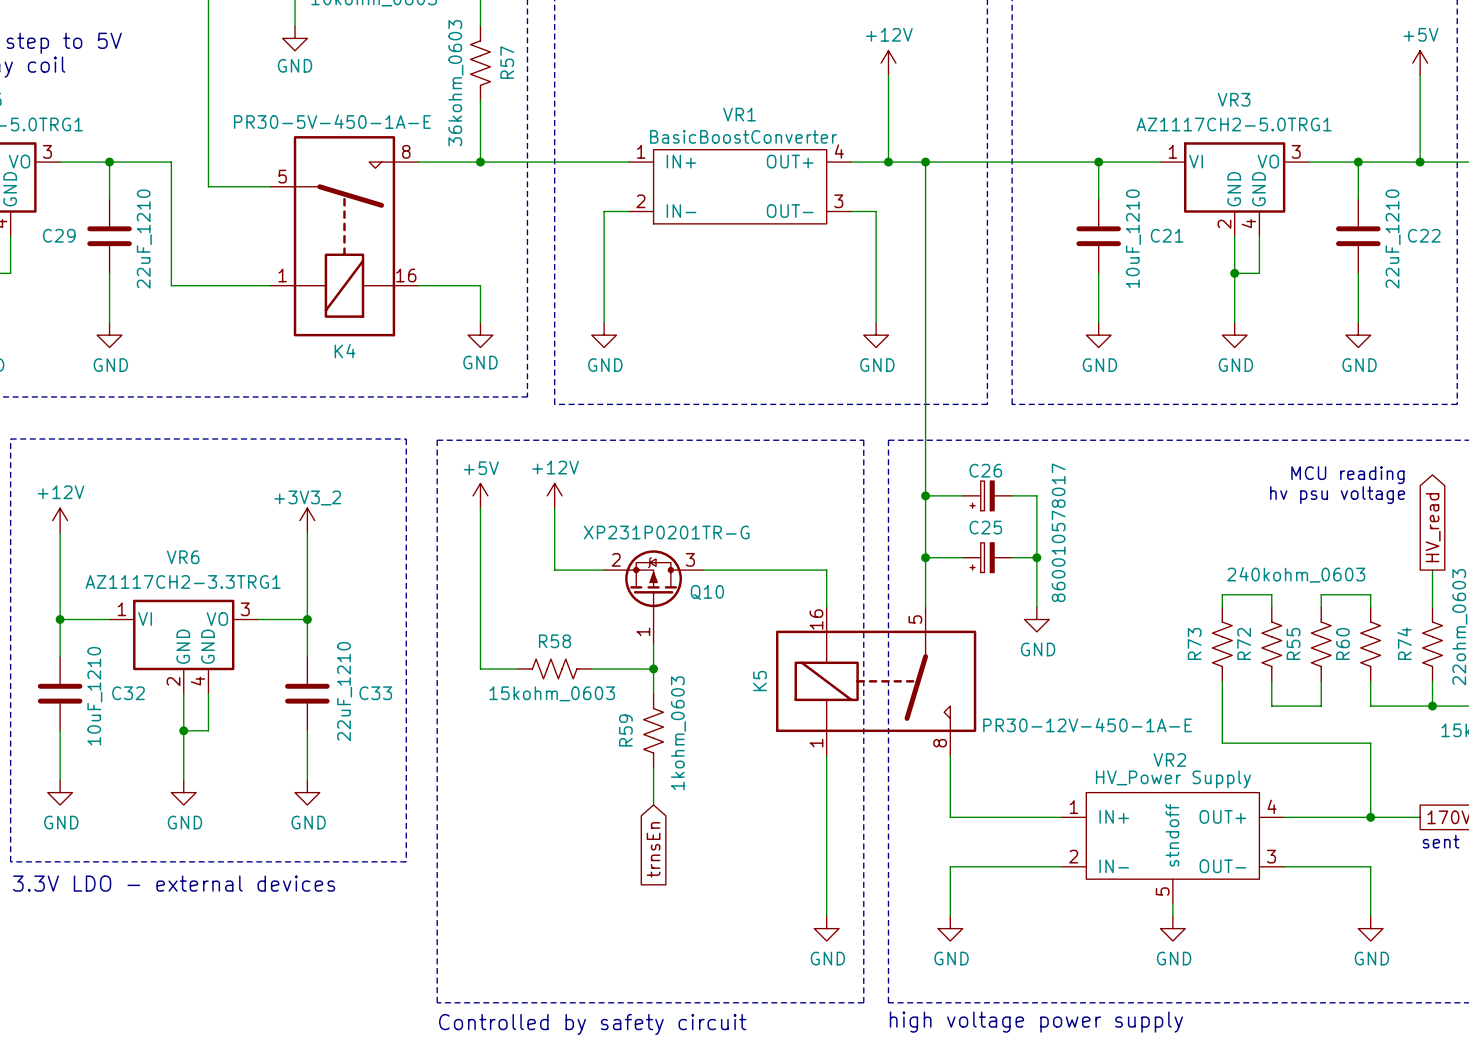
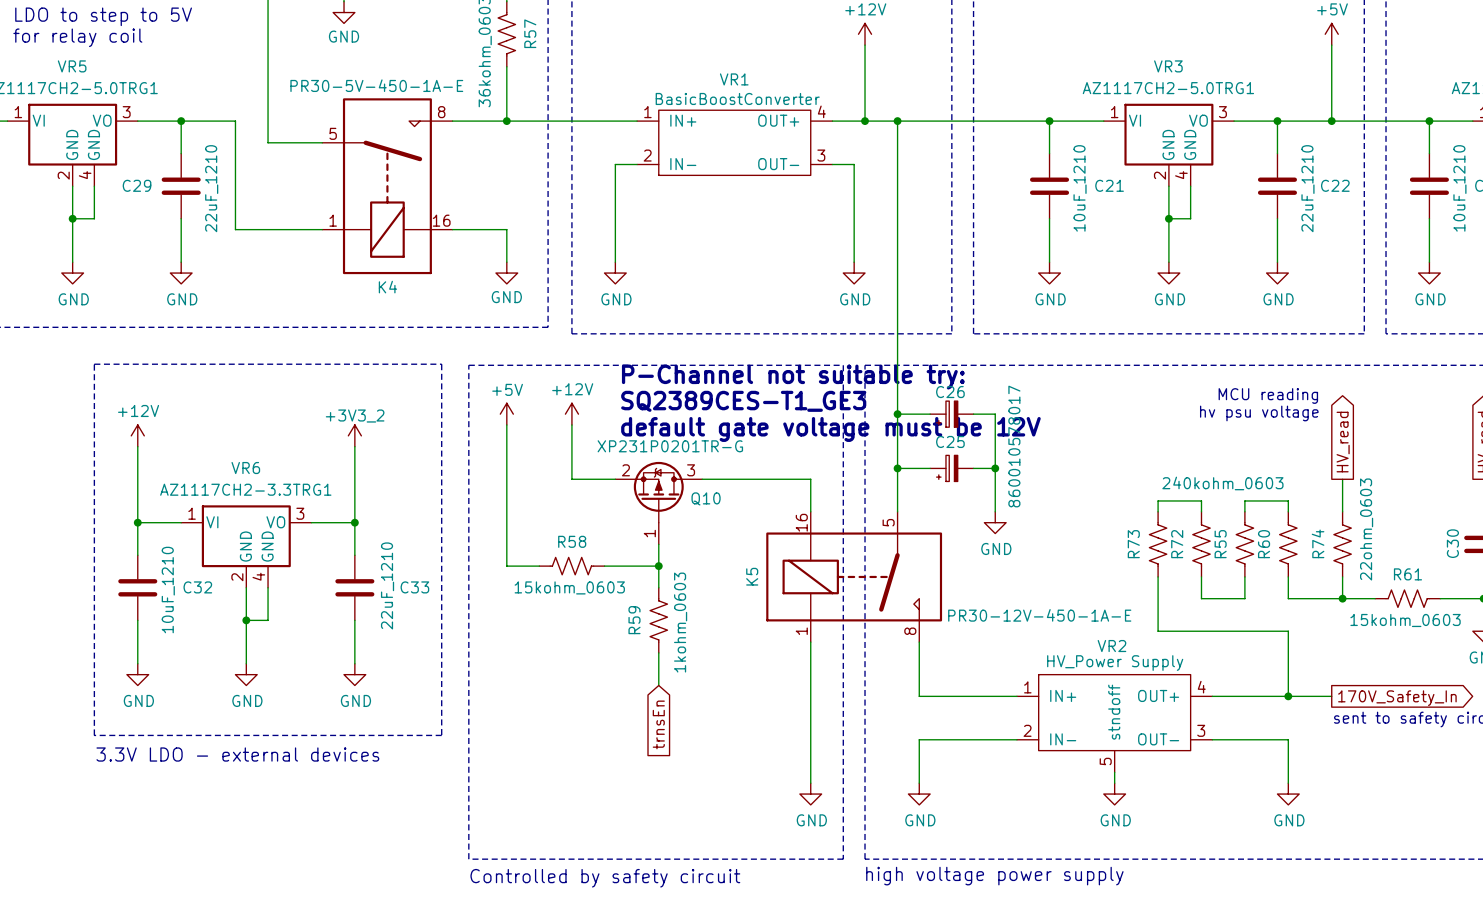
text: none -> P-Channel not suitable try: (793, 377)
text: none -> SQ2389CES-T1_GE3 (743, 401)
text: none -> default gate voltage must be 12V (830, 429)

